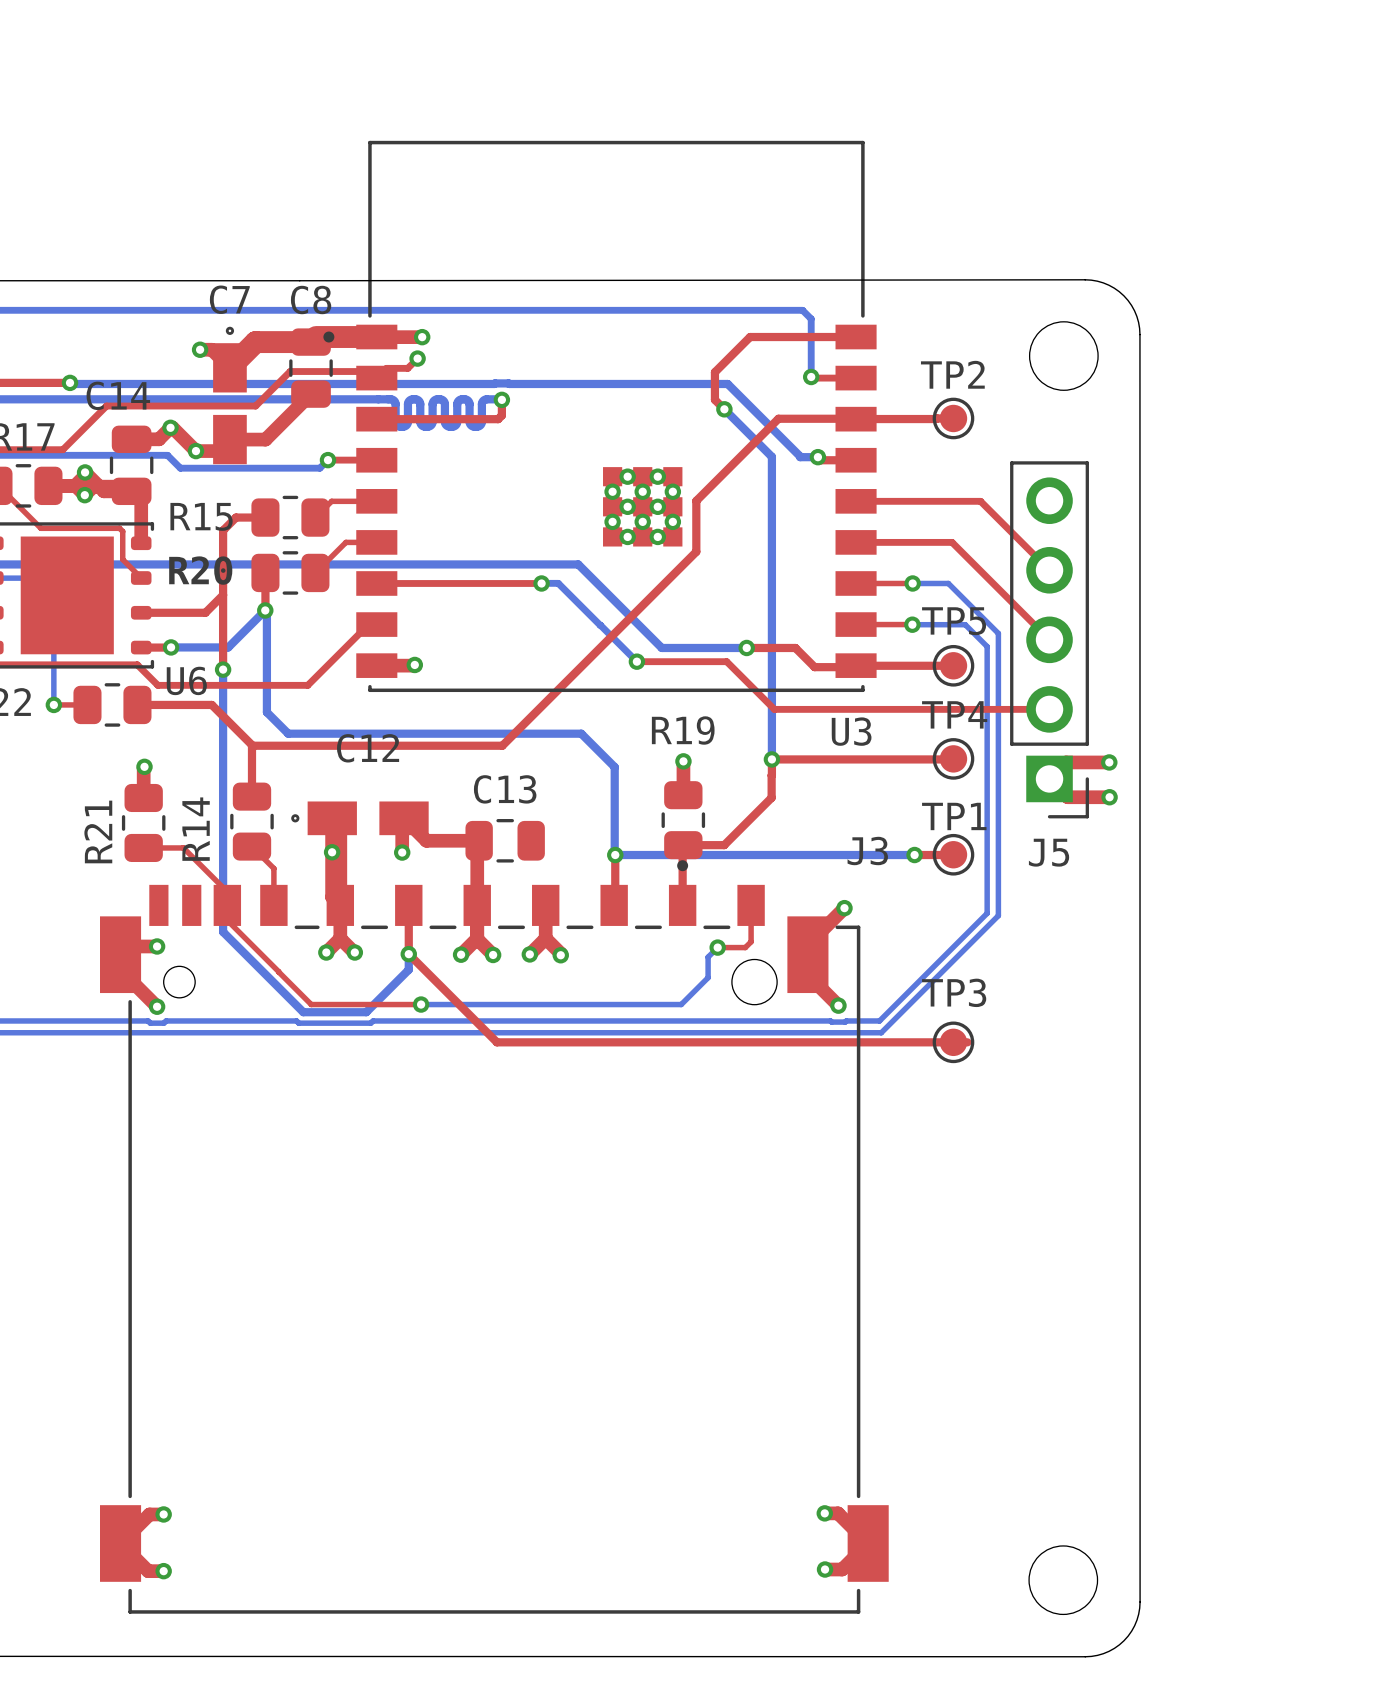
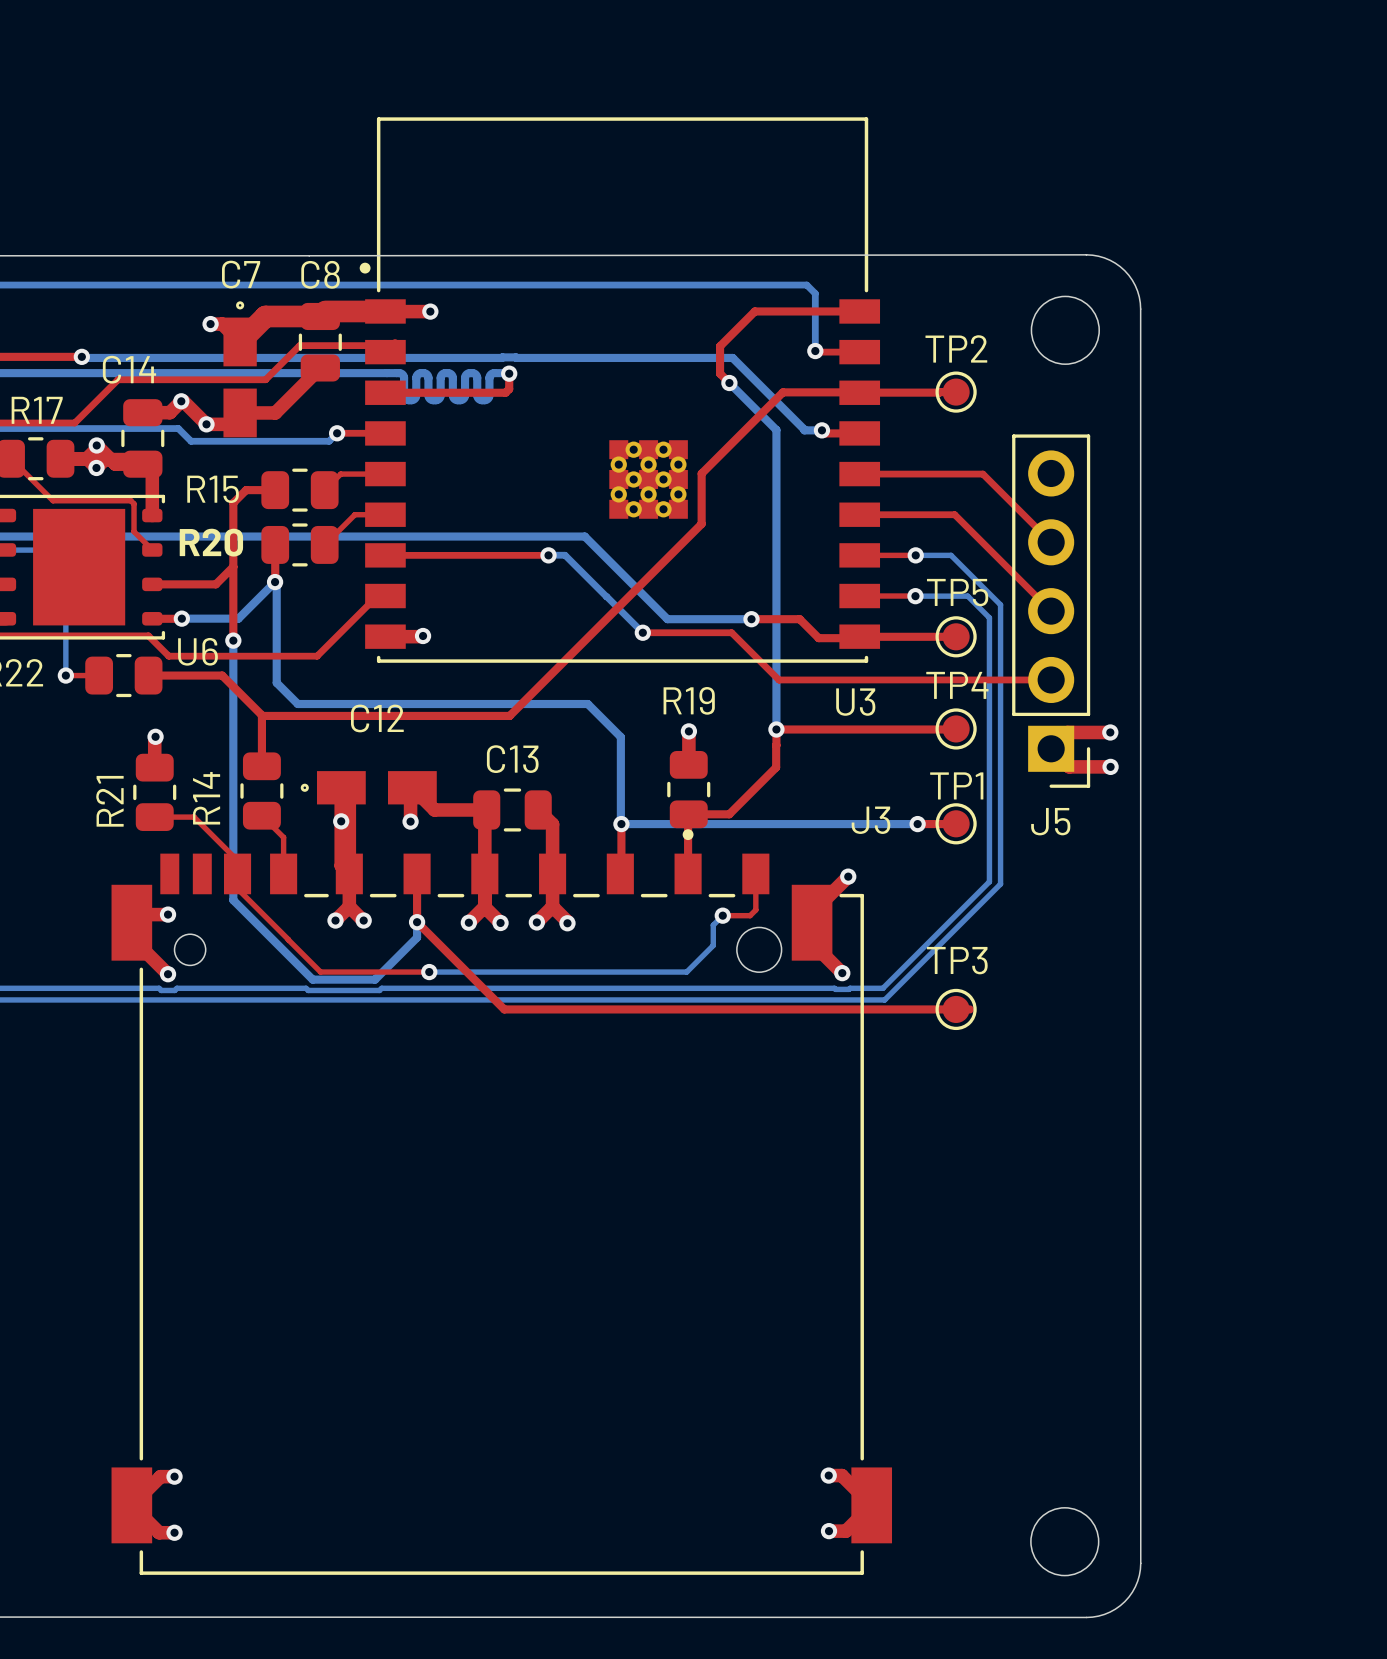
U3 footprint: [323, 140, 877, 693] -> [359, 117, 881, 663]
top track: (417, 358) (407, 368) (386, 368) -> none
via: (417, 358) -> none
top track: none -> (538, 809) (552, 824) (552, 873)

